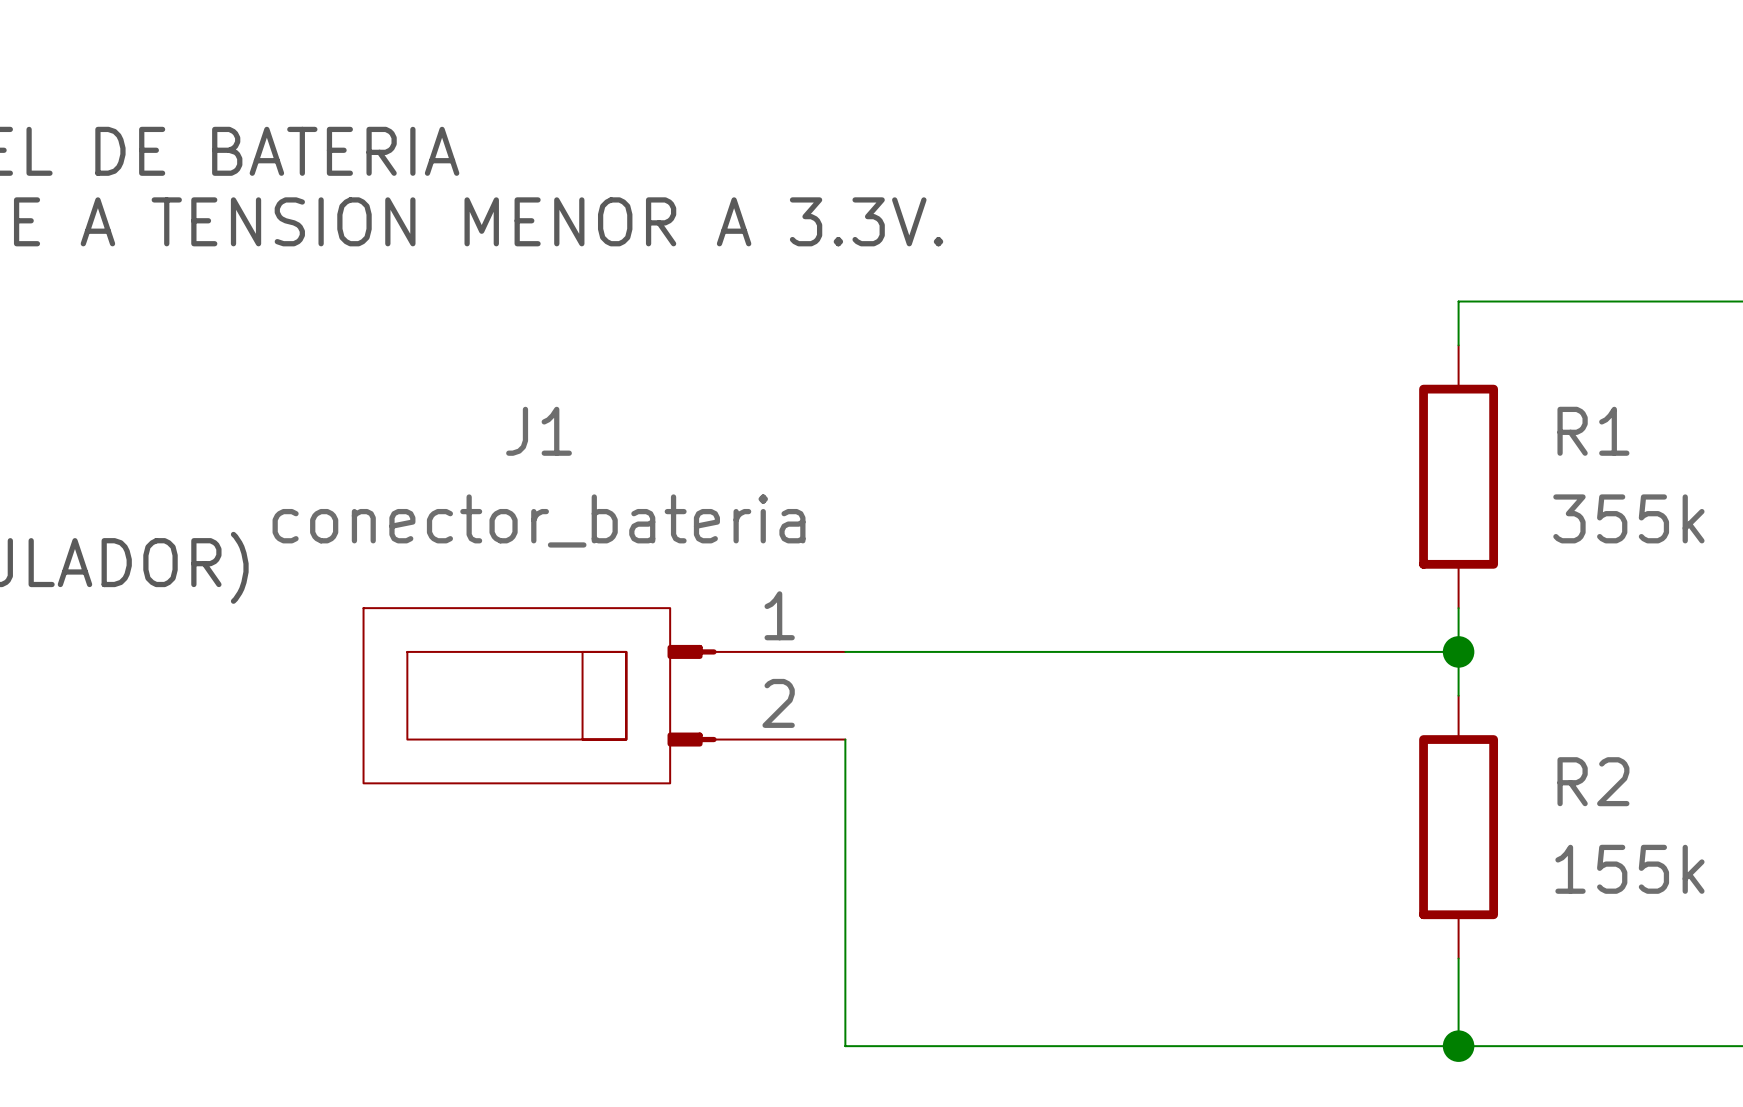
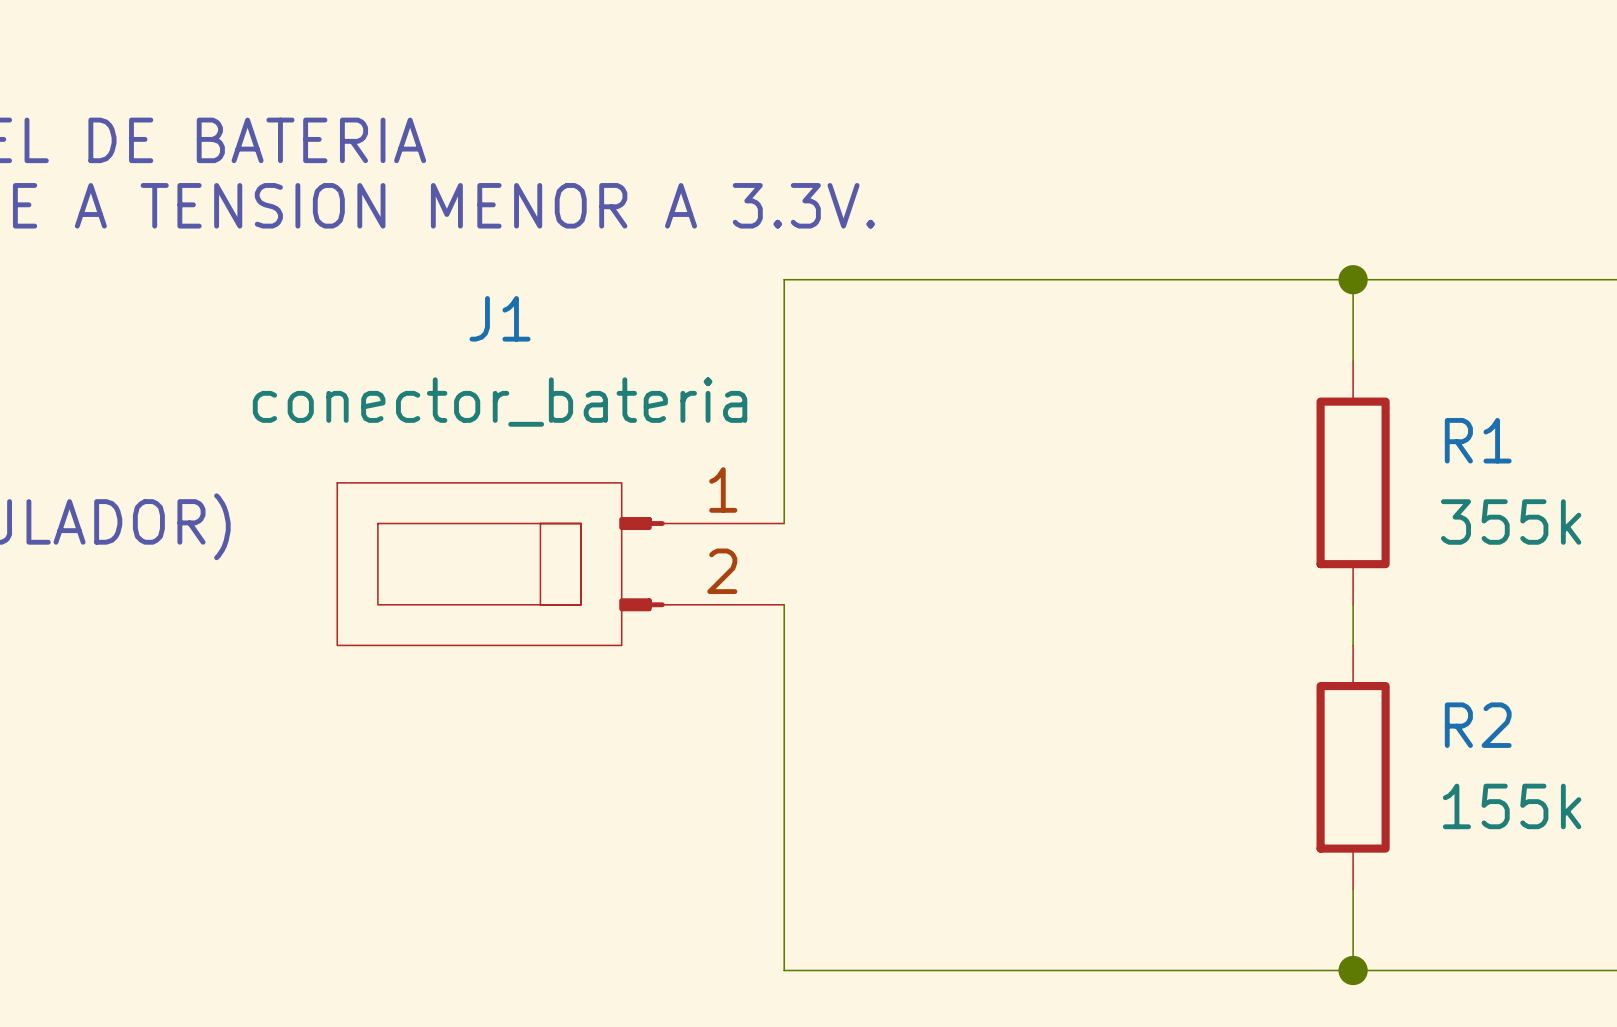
wire: none -> (1353, 279) (784, 279) (784, 523)
junction: none -> (1353, 279)
R1 position: (1458, 476) -> (1353, 482)
wire: (1458, 608) (1458, 651) (845, 651) -> (784, 686) (784, 604)
junction: (1458, 651) -> none
J1 position: (604, 695) -> (560, 564)

